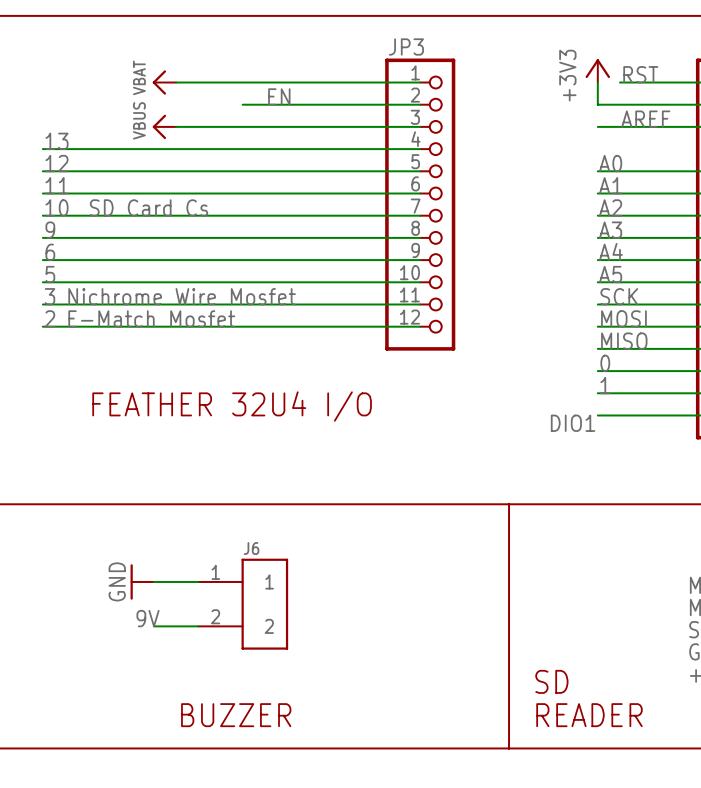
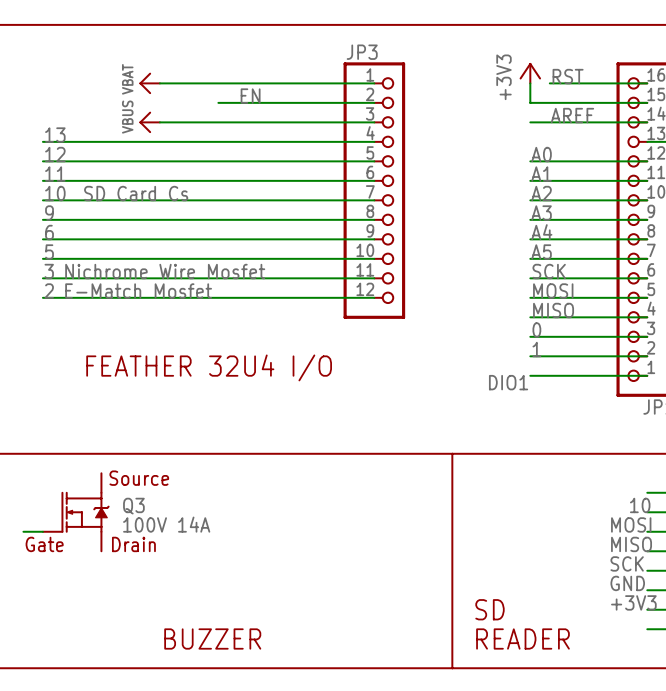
text: none -> Source (139, 478)
Q3: none -> 100V 14A (76, 512)
power symbol: GND (142, 581) -> none
wire: (153, 581) (198, 581) -> none
wire: none -> (23, 531) (42, 531)
J6: (243, 604) -> none
text: none -> Gate (44, 544)
text: none -> Drain (133, 544)
label: 9V (148, 618) -> none
wire: (153, 626) (198, 626) -> none

